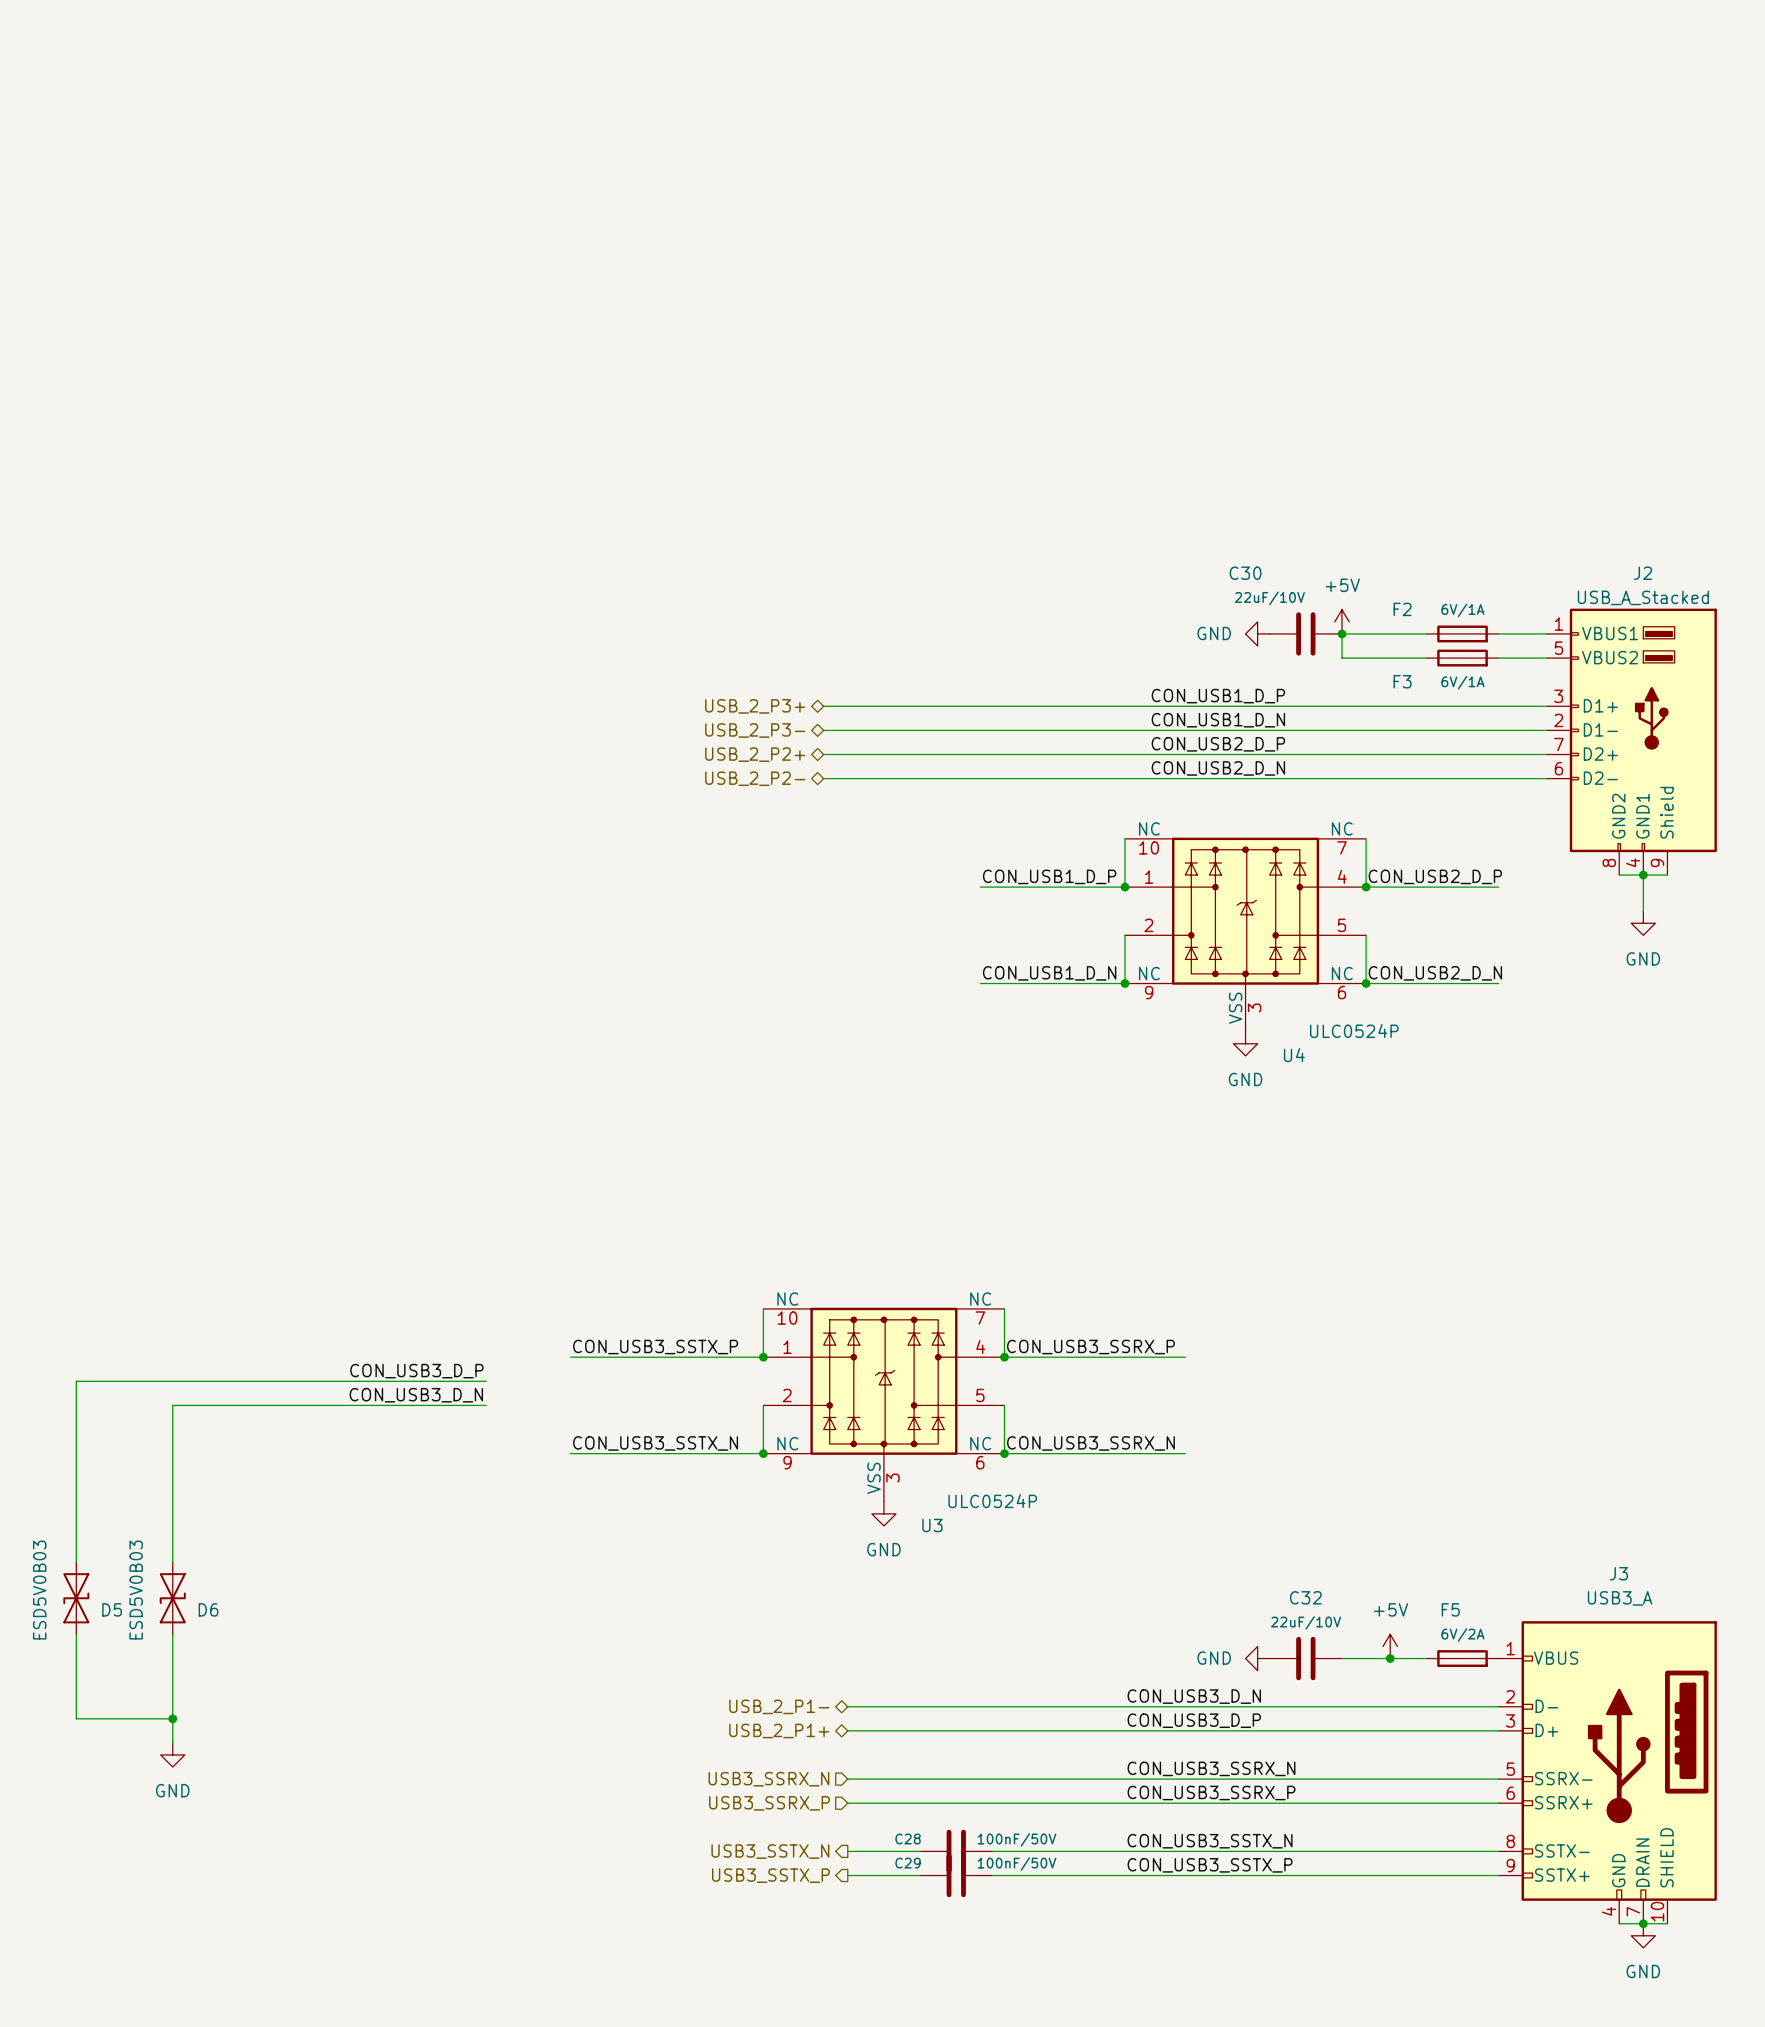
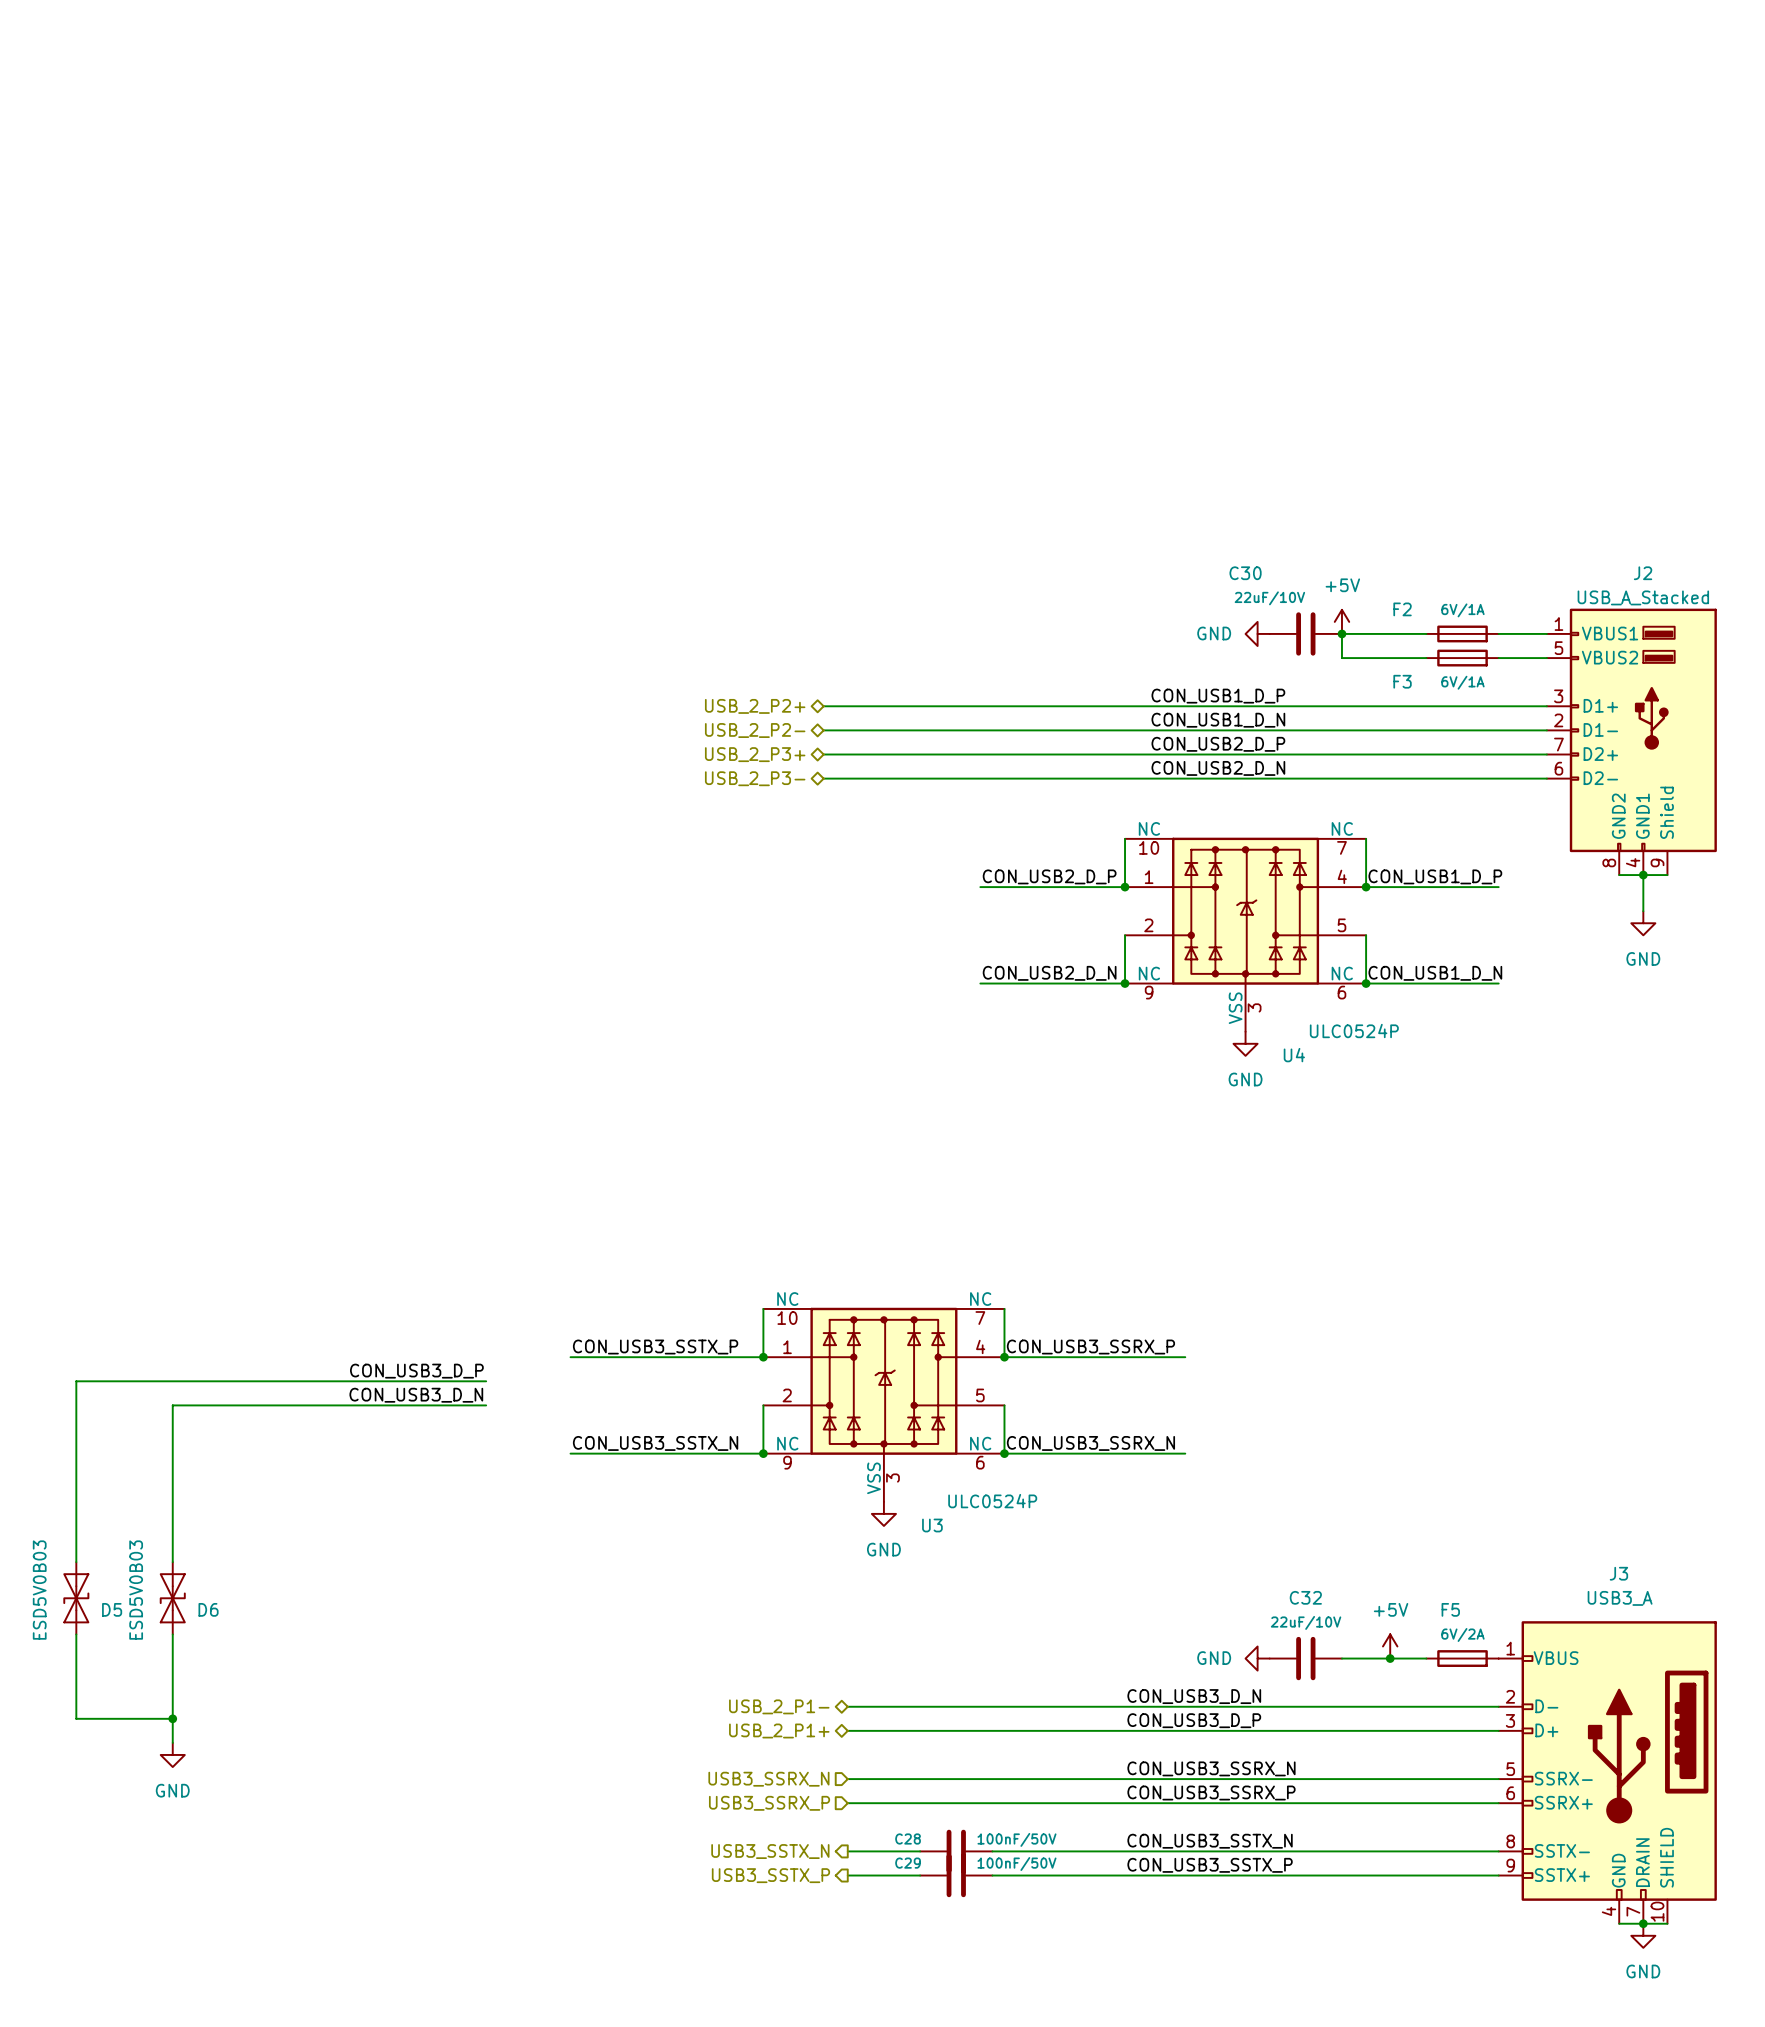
hierarchical label: USB_2_P3+ (755, 706) -> USB_2_P2+ (755, 706)
hierarchical label: USB_2_P3- (755, 730) -> USB_2_P2- (755, 730)
hierarchical label: USB_2_P2+ (755, 754) -> USB_2_P3+ (755, 754)
hierarchical label: USB_2_P2- (755, 778) -> USB_2_P3- (755, 778)
label: CON_USB1_D_P (1049, 876) -> CON_USB2_D_P (1049, 876)
label: CON_USB2_D_P (1435, 876) -> CON_USB1_D_P (1435, 876)
label: CON_USB1_D_N (1049, 973) -> CON_USB2_D_N (1049, 973)
label: CON_USB2_D_N (1435, 973) -> CON_USB1_D_N (1435, 973)

